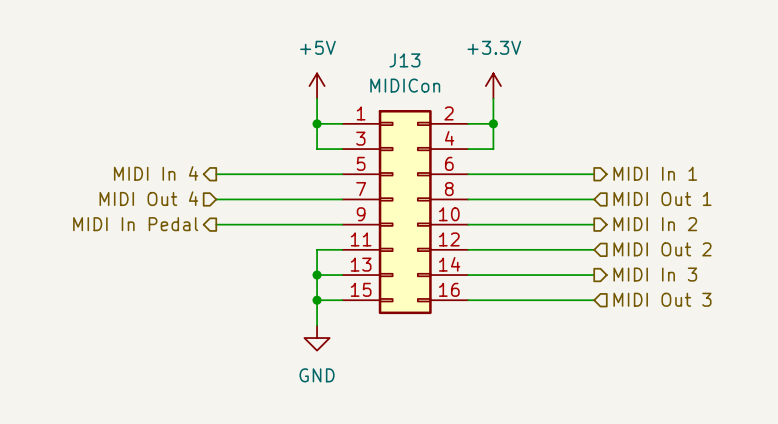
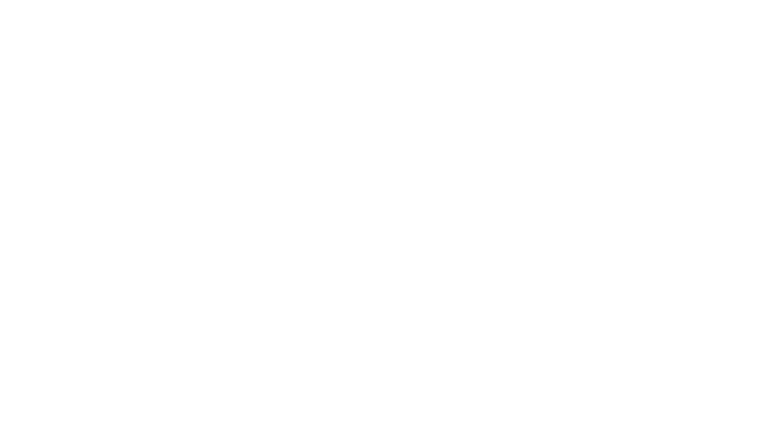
power symbol: +5V (317, 86) -> none
power symbol: +3.3V (493, 86) -> none
wire: (317, 98) (317, 149) (342, 149) -> none
wire: (493, 98) (493, 149) (468, 149) -> none
wire: (317, 123) (342, 123) -> none
junction: (317, 123) -> none
wire: (468, 123) (493, 123) -> none
junction: (493, 123) -> none
hierarchical label: MIDI In 4 (156, 173) -> none
hierarchical label: MIDI In 1 (655, 173) -> none
wire: (216, 174) (342, 174) -> none
wire: (468, 174) (594, 174) -> none
hierarchical label: MIDI Out 4 (148, 198) -> none
hierarchical label: MIDI Out 1 (662, 198) -> none
wire: (216, 199) (342, 199) -> none
wire: (468, 199) (594, 199) -> none
J13: MIDICon (405, 212) -> none
hierarchical label: MIDI In Pedal (135, 224) -> none
wire: (216, 224) (342, 224) -> none
wire: (468, 224) (594, 224) -> none
hierarchical label: MIDI In 2 (655, 224) -> none
wire: (342, 249) (317, 249) (317, 325) -> none
wire: (468, 249) (594, 249) -> none
hierarchical label: MIDI Out 2 (662, 249) -> none
hierarchical label: MIDI In 3 (655, 274) -> none
wire: (317, 275) (342, 275) -> none
junction: (317, 275) -> none
wire: (468, 275) (594, 275) -> none
hierarchical label: MIDI Out 3 (662, 299) -> none
wire: (317, 300) (342, 300) -> none
junction: (317, 300) -> none
wire: (468, 300) (594, 300) -> none
power symbol: GND (317, 338) -> none

